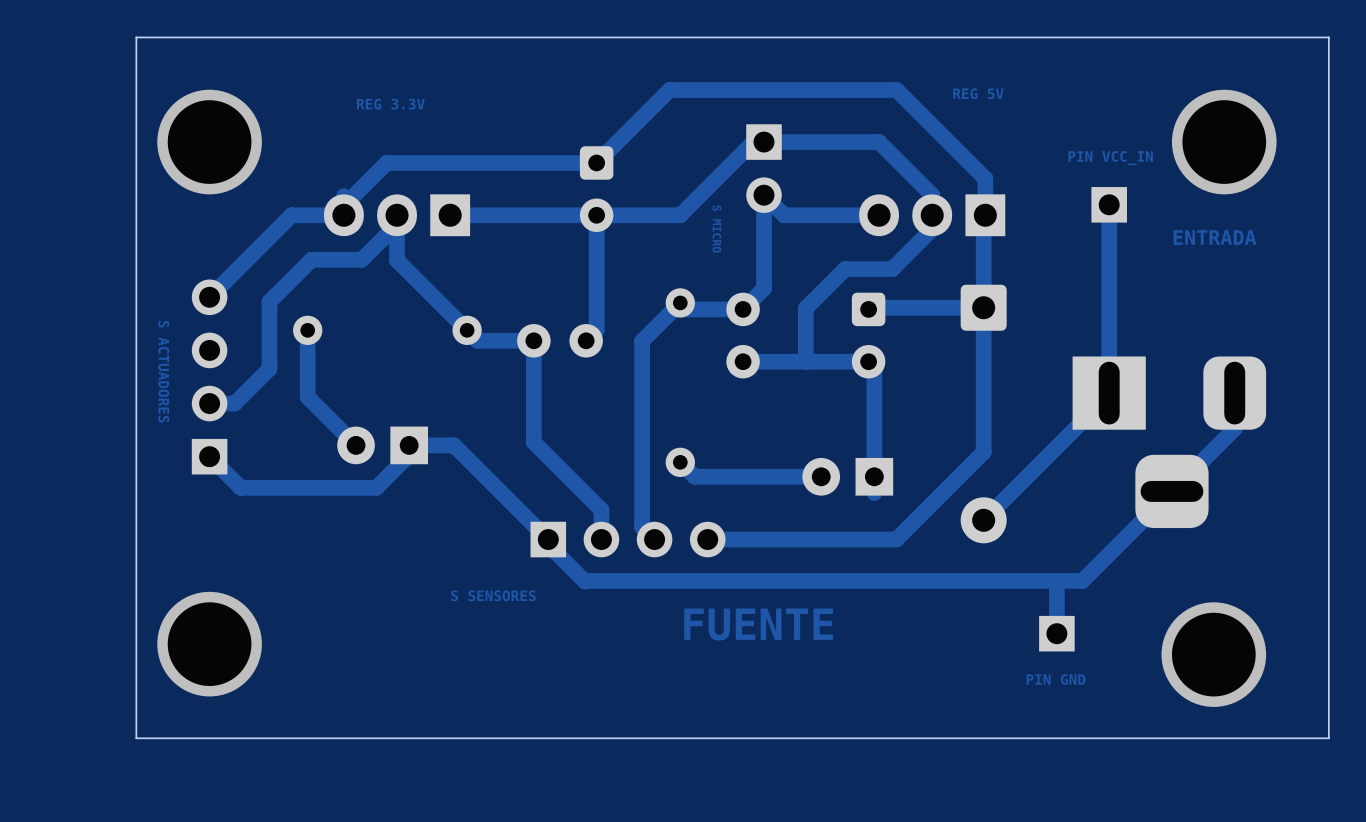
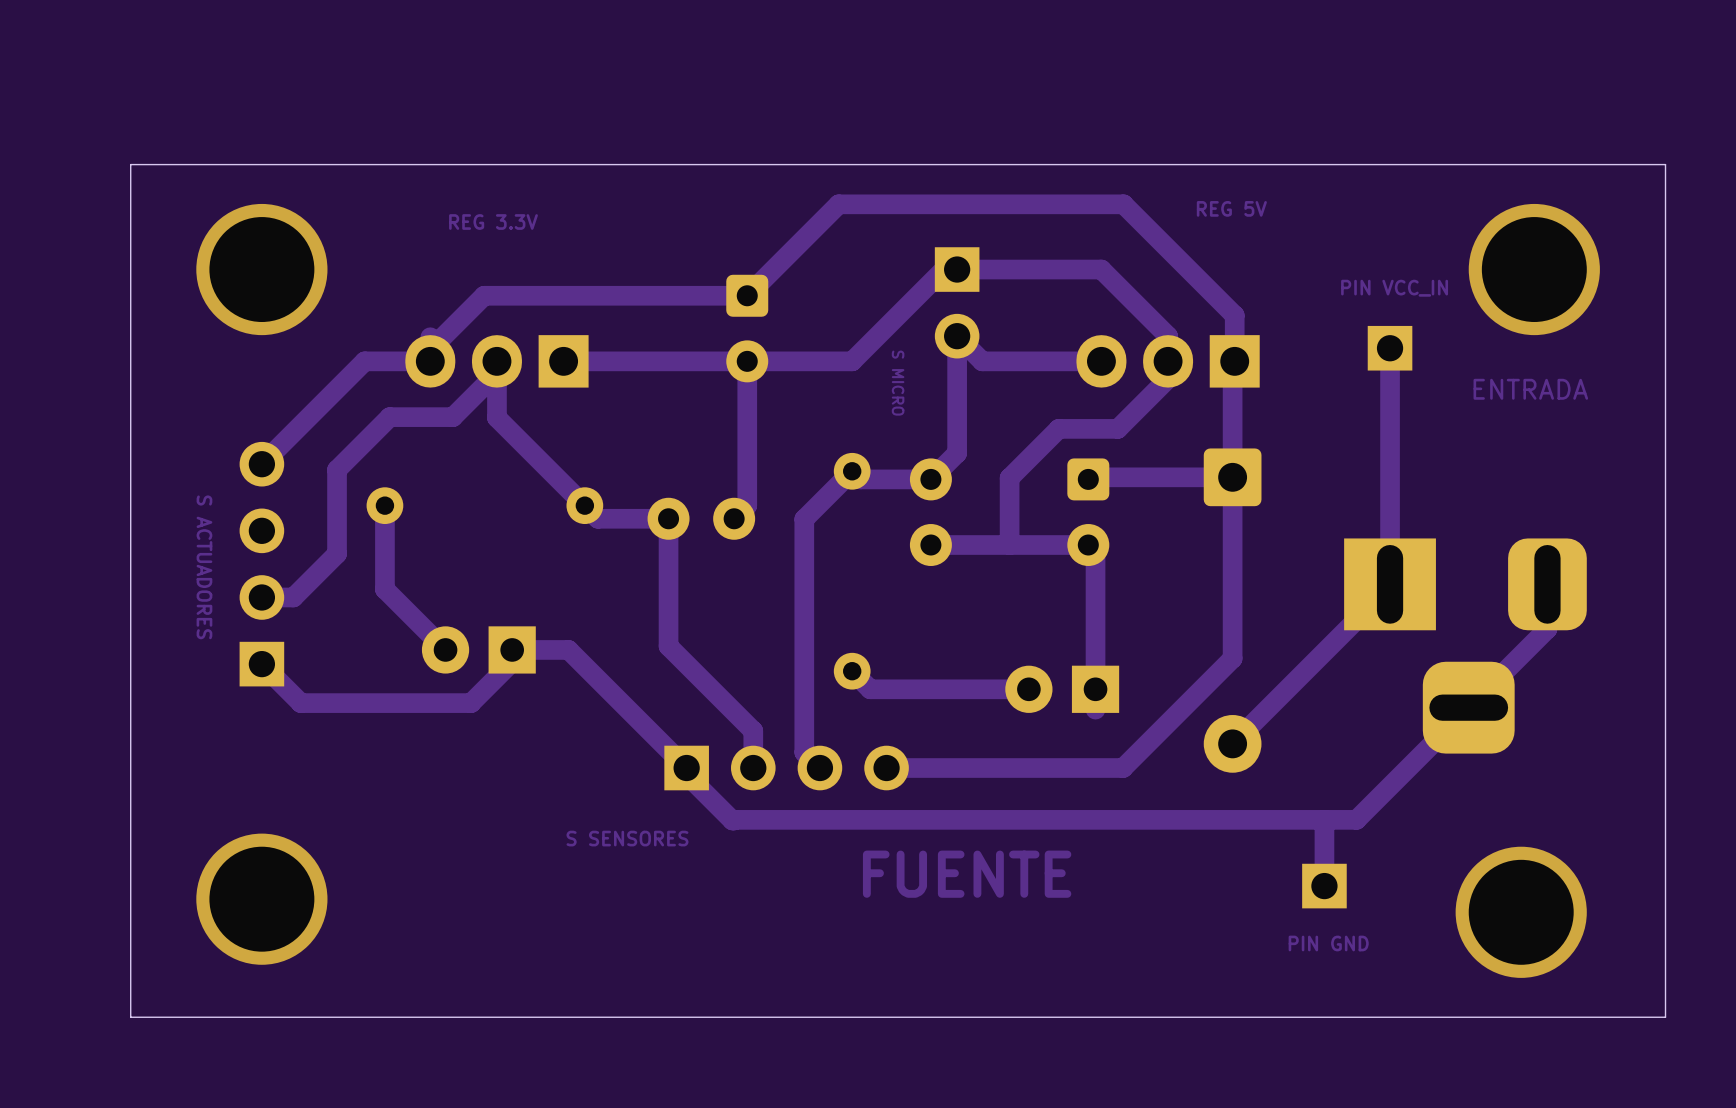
board edge: (1328, 58) (1328, 37) (136, 37) (136, 738) -> (1665, 164) (130, 164) (130, 1017) (170, 1017)

